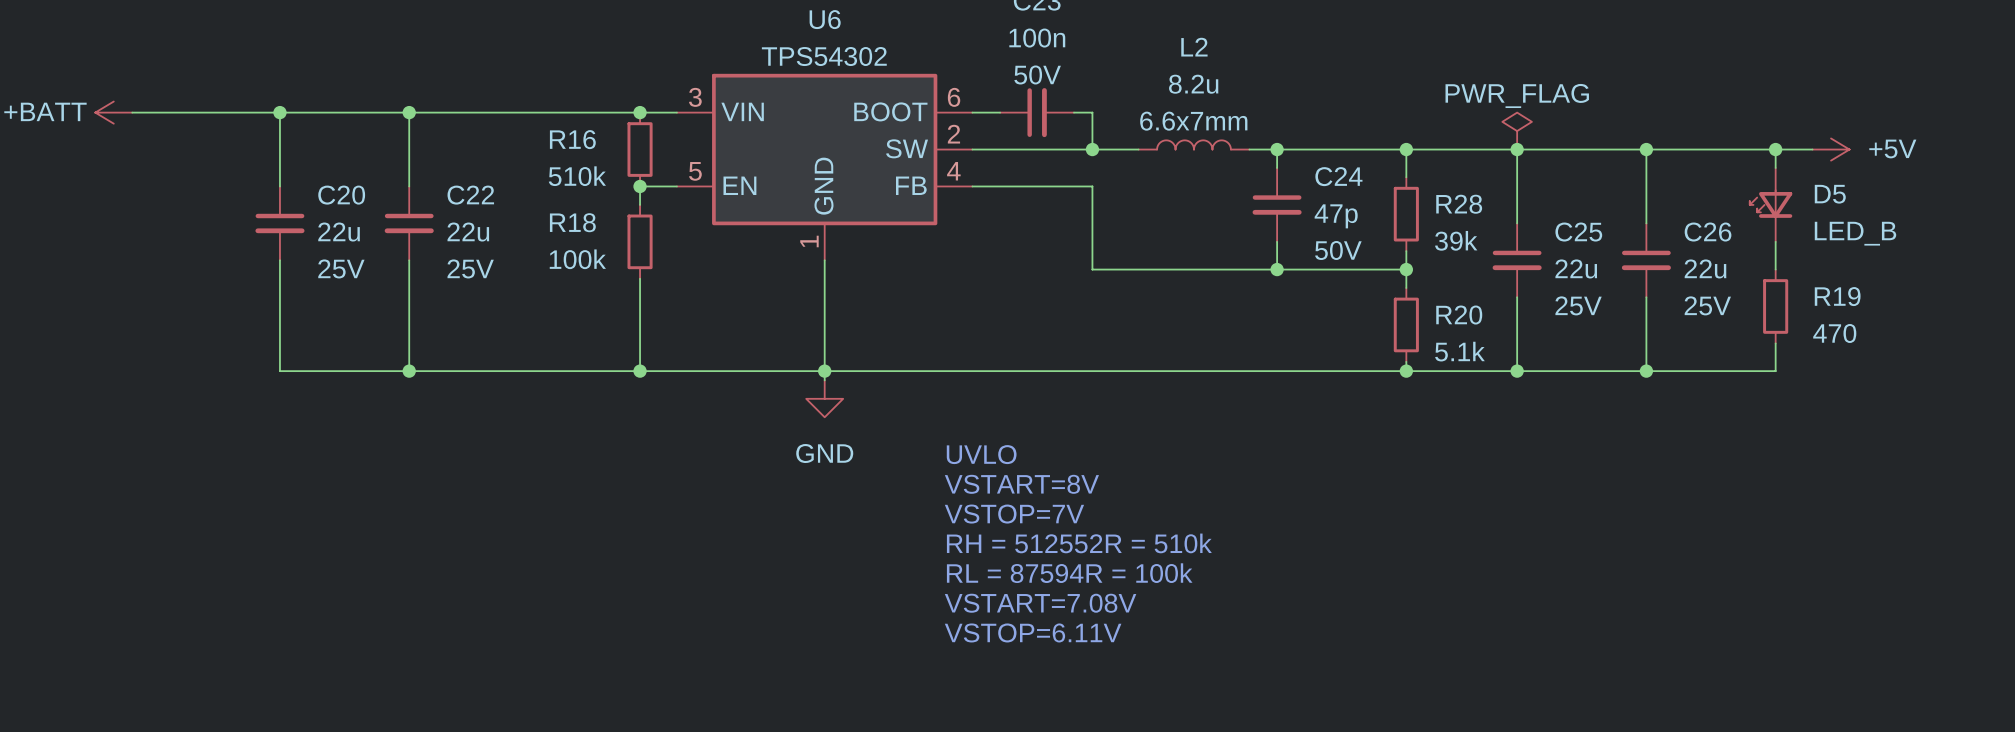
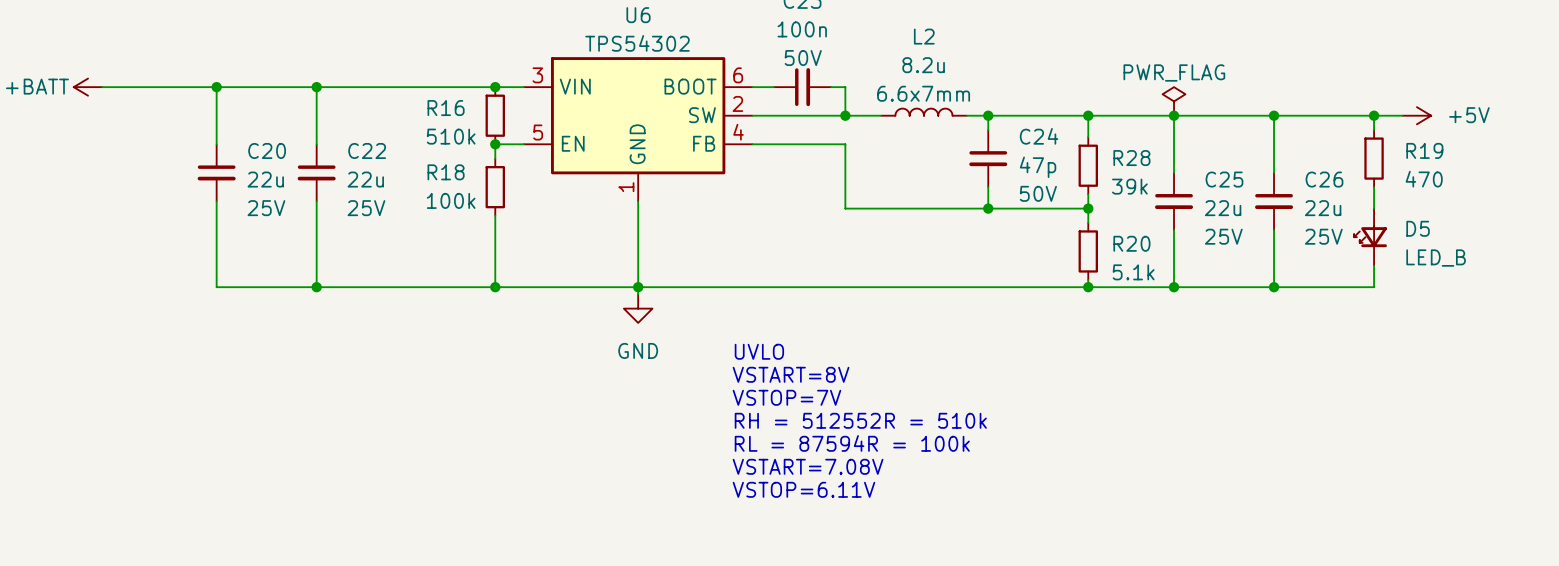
D5 position: (1771, 204) -> (1370, 237)
R19 position: (1775, 306) -> (1374, 158)

